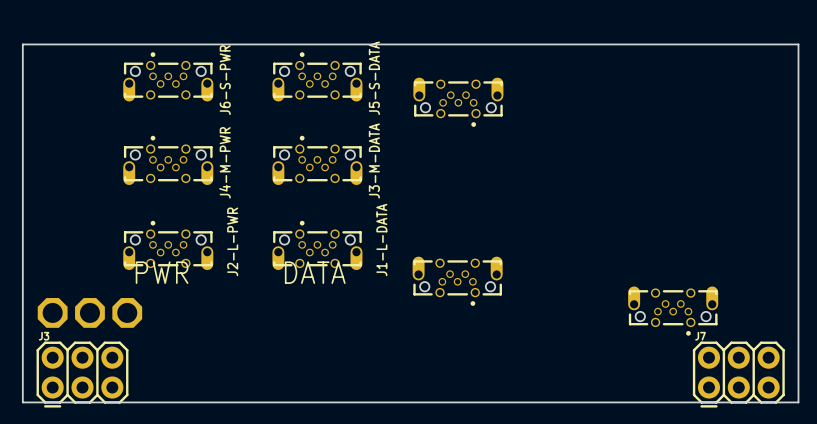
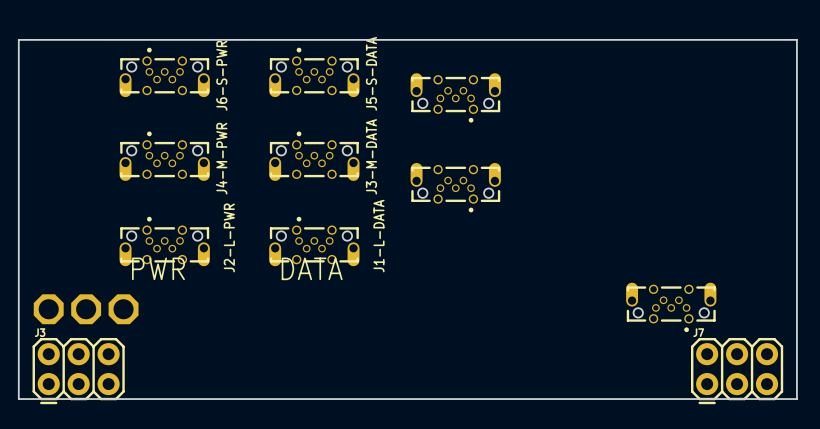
part position: (457, 281) -> (455, 187)

